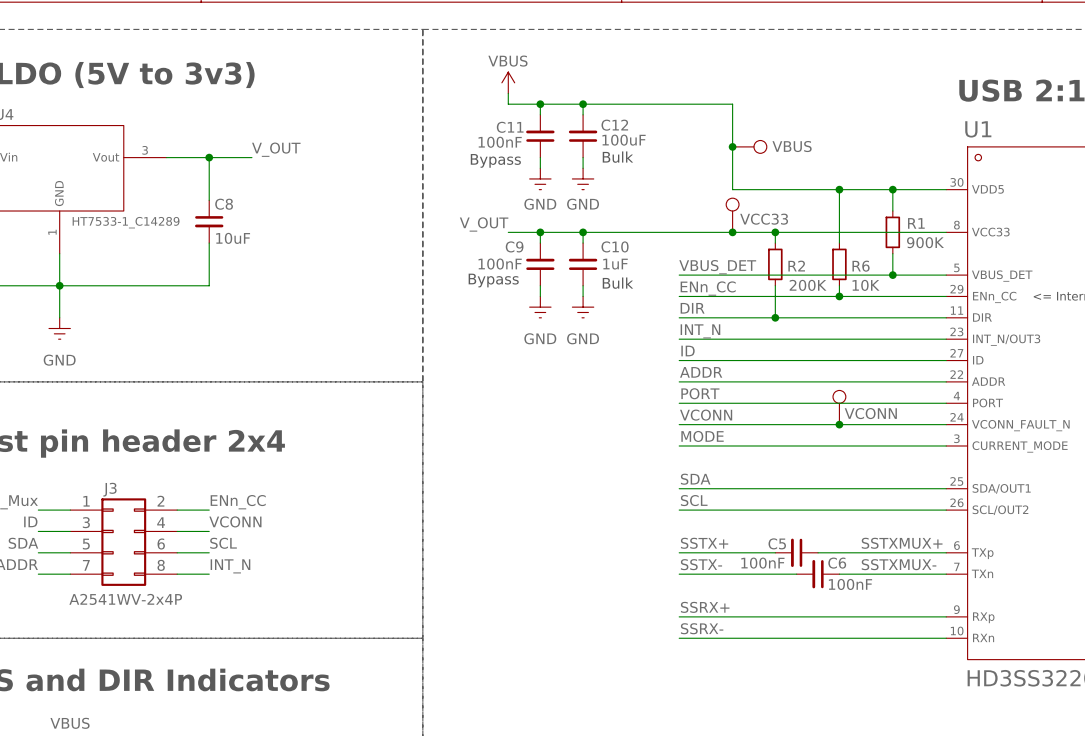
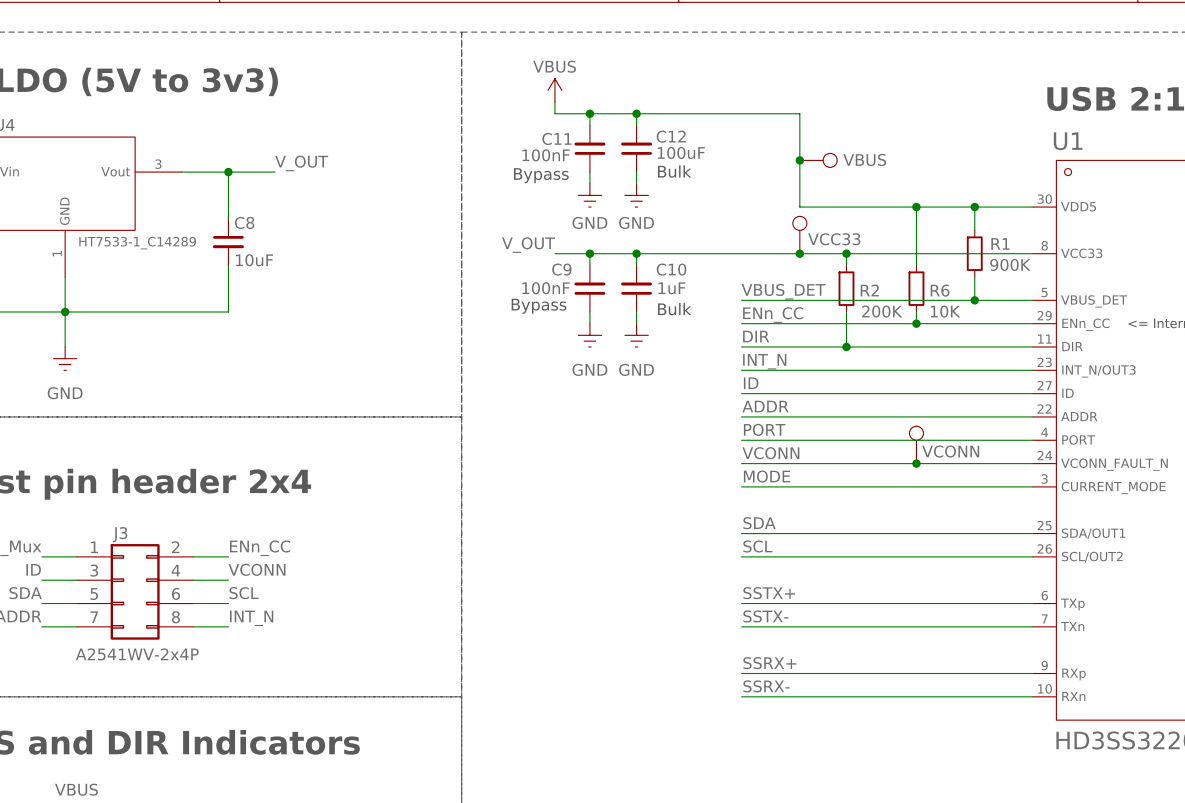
label: SSTXMUX+ (902, 543) -> none
C5: 100nF (796, 552) -> none
label: SSTXMUX- (899, 564) -> none
C6: 100nF (818, 574) -> none

